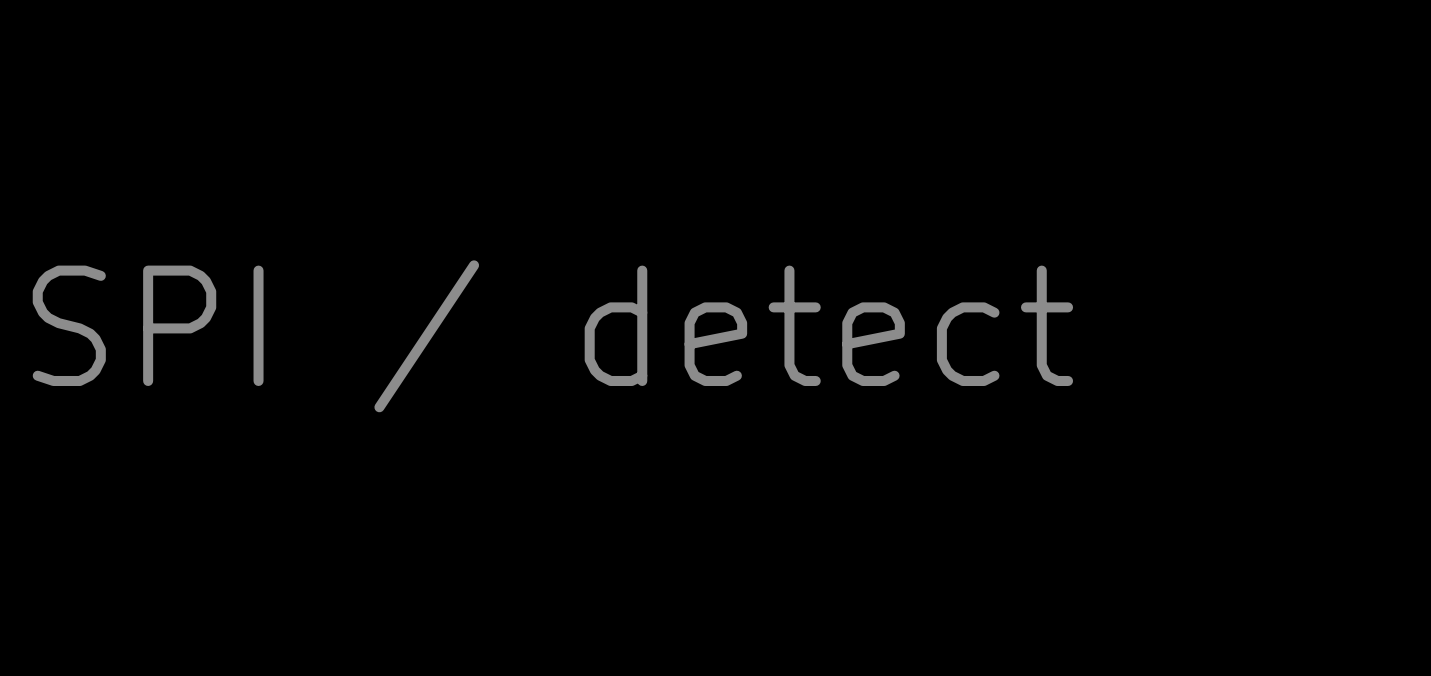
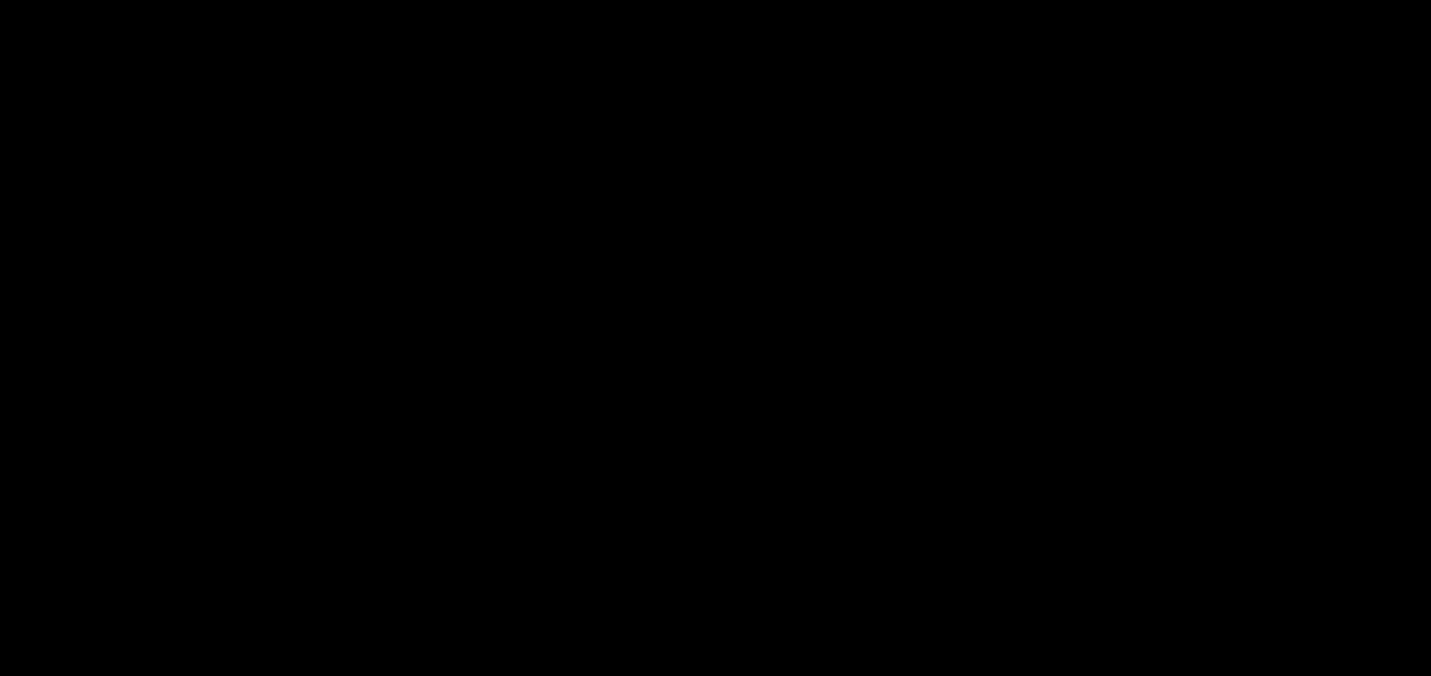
text: SPI / detect (552, 336) -> none

